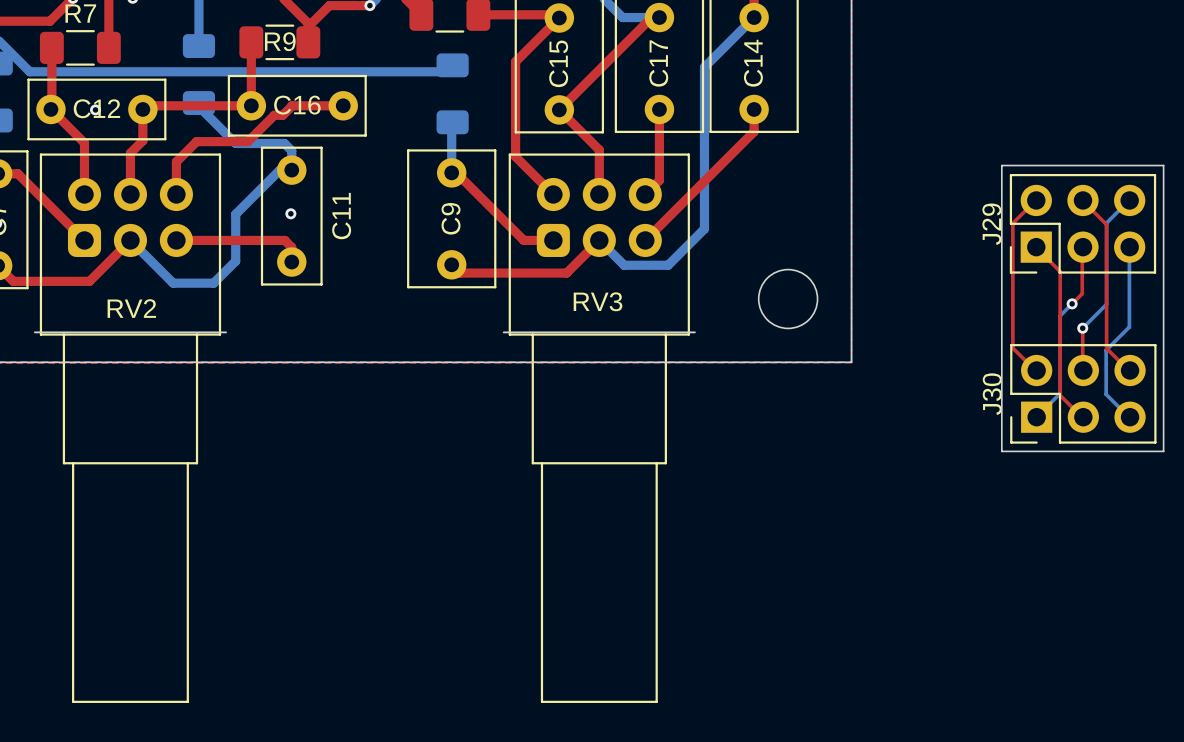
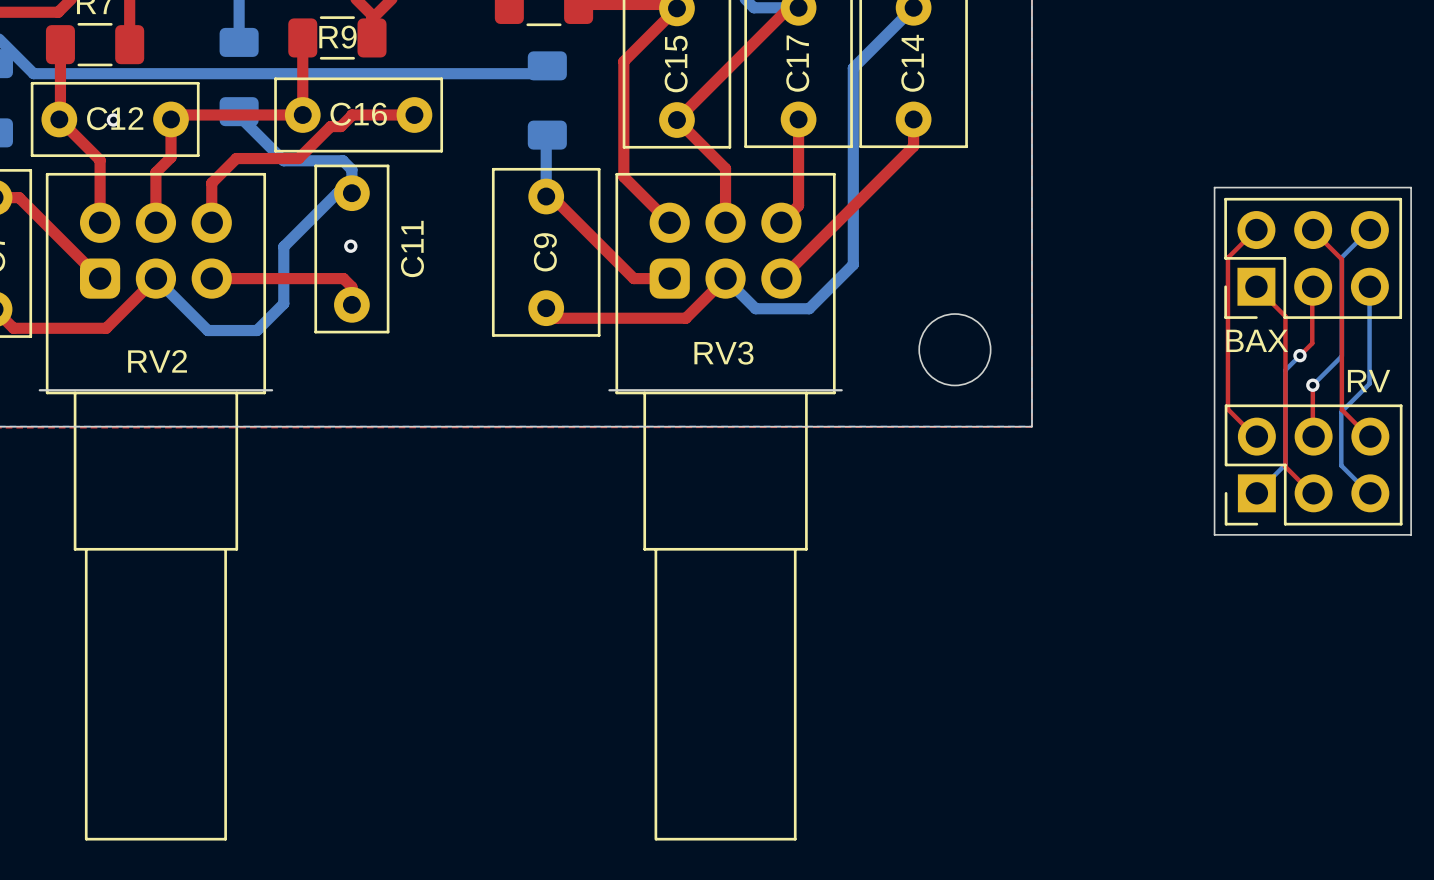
J29 name: J29 (991, 224) -> BAX (1257, 340)
J30 name: J30 (992, 394) -> RV (1369, 381)

